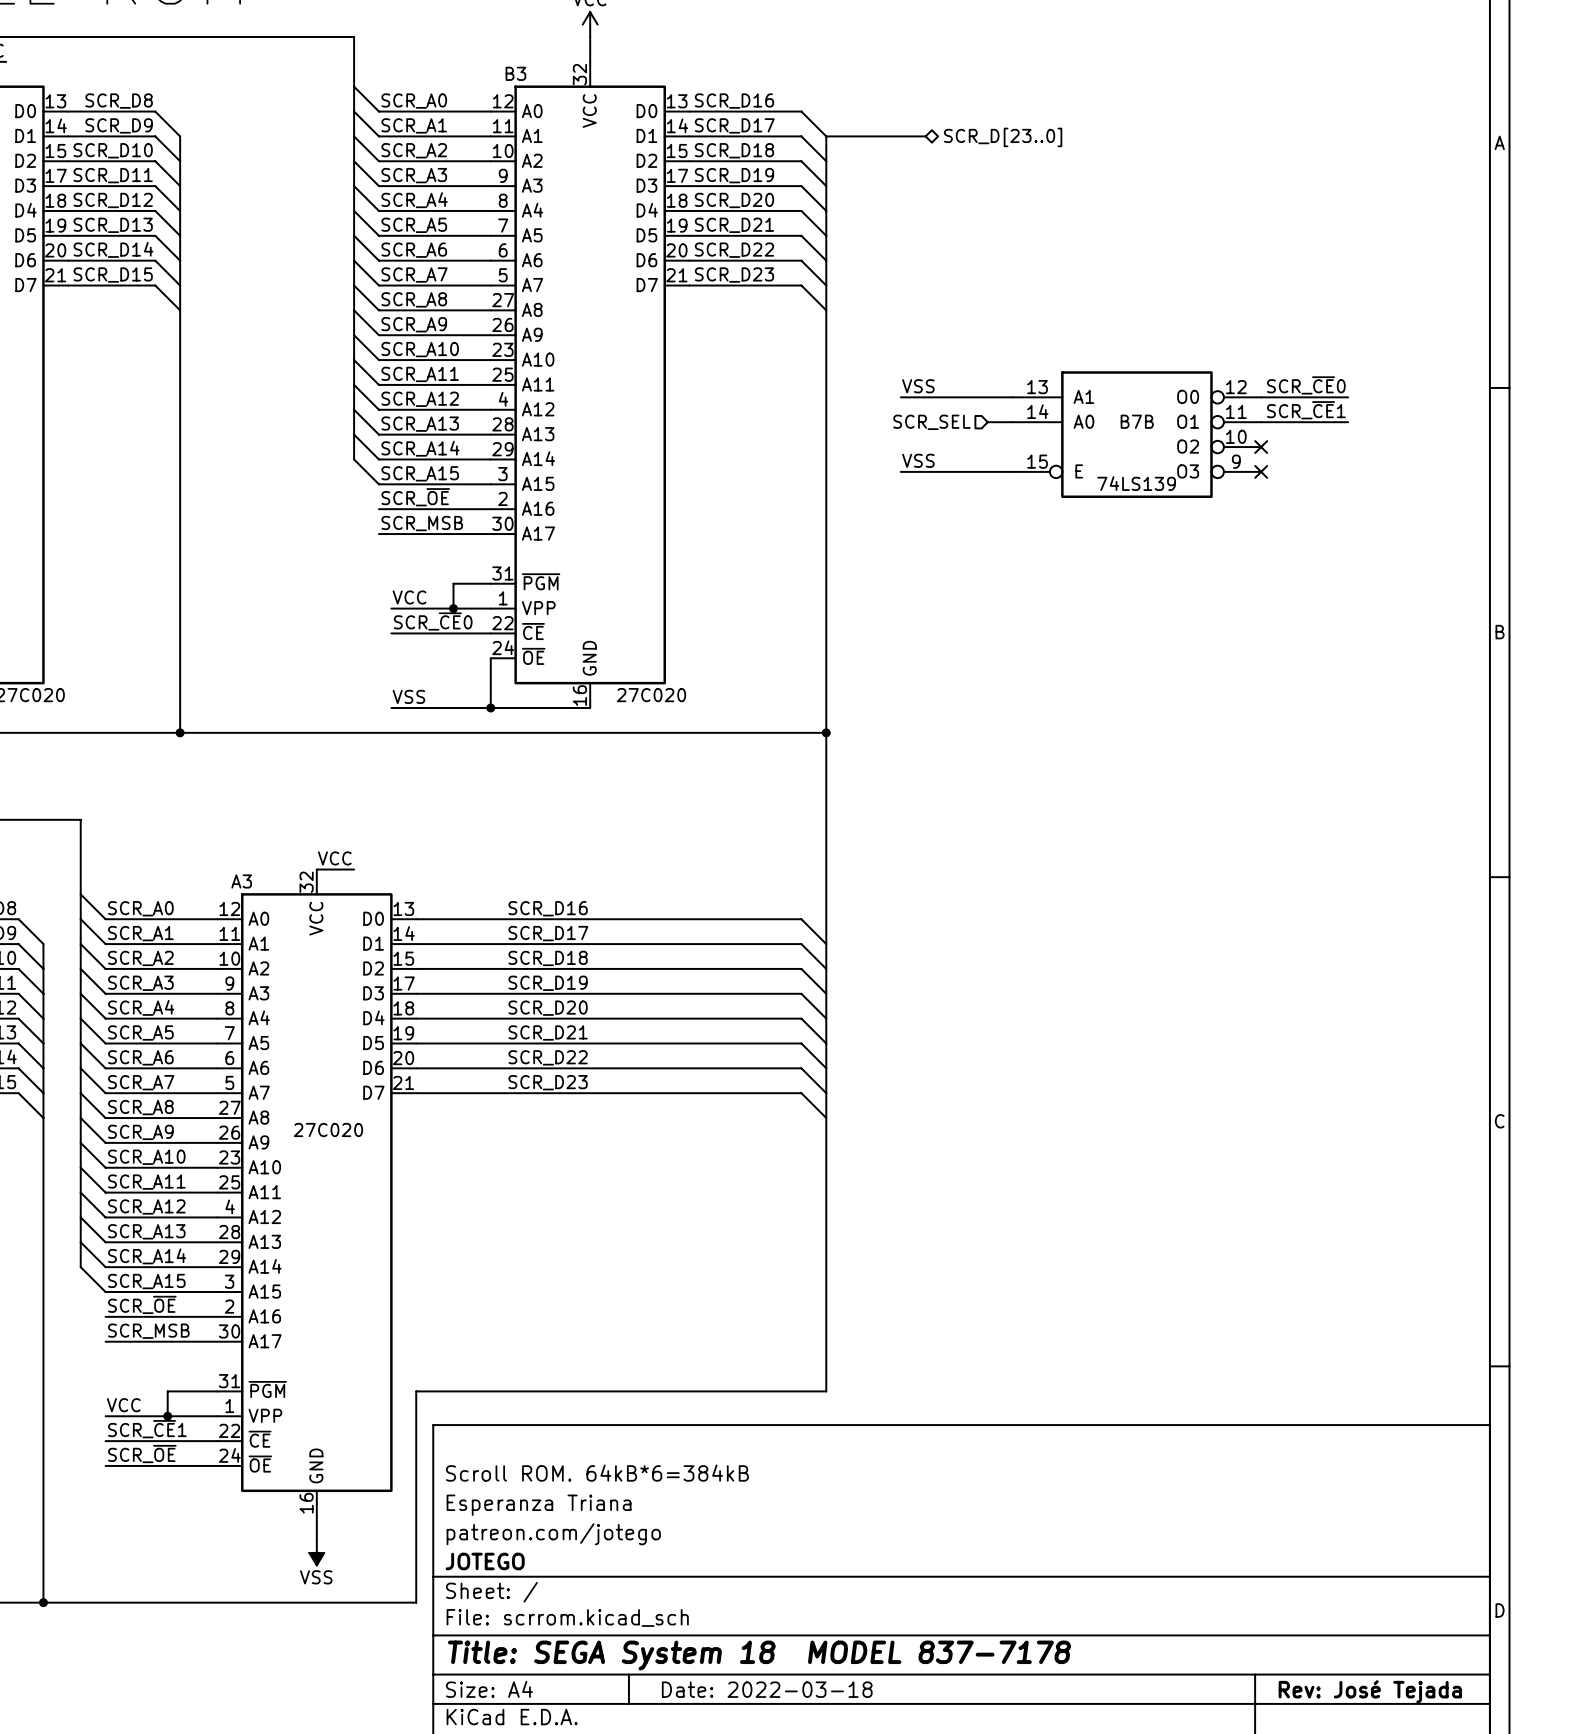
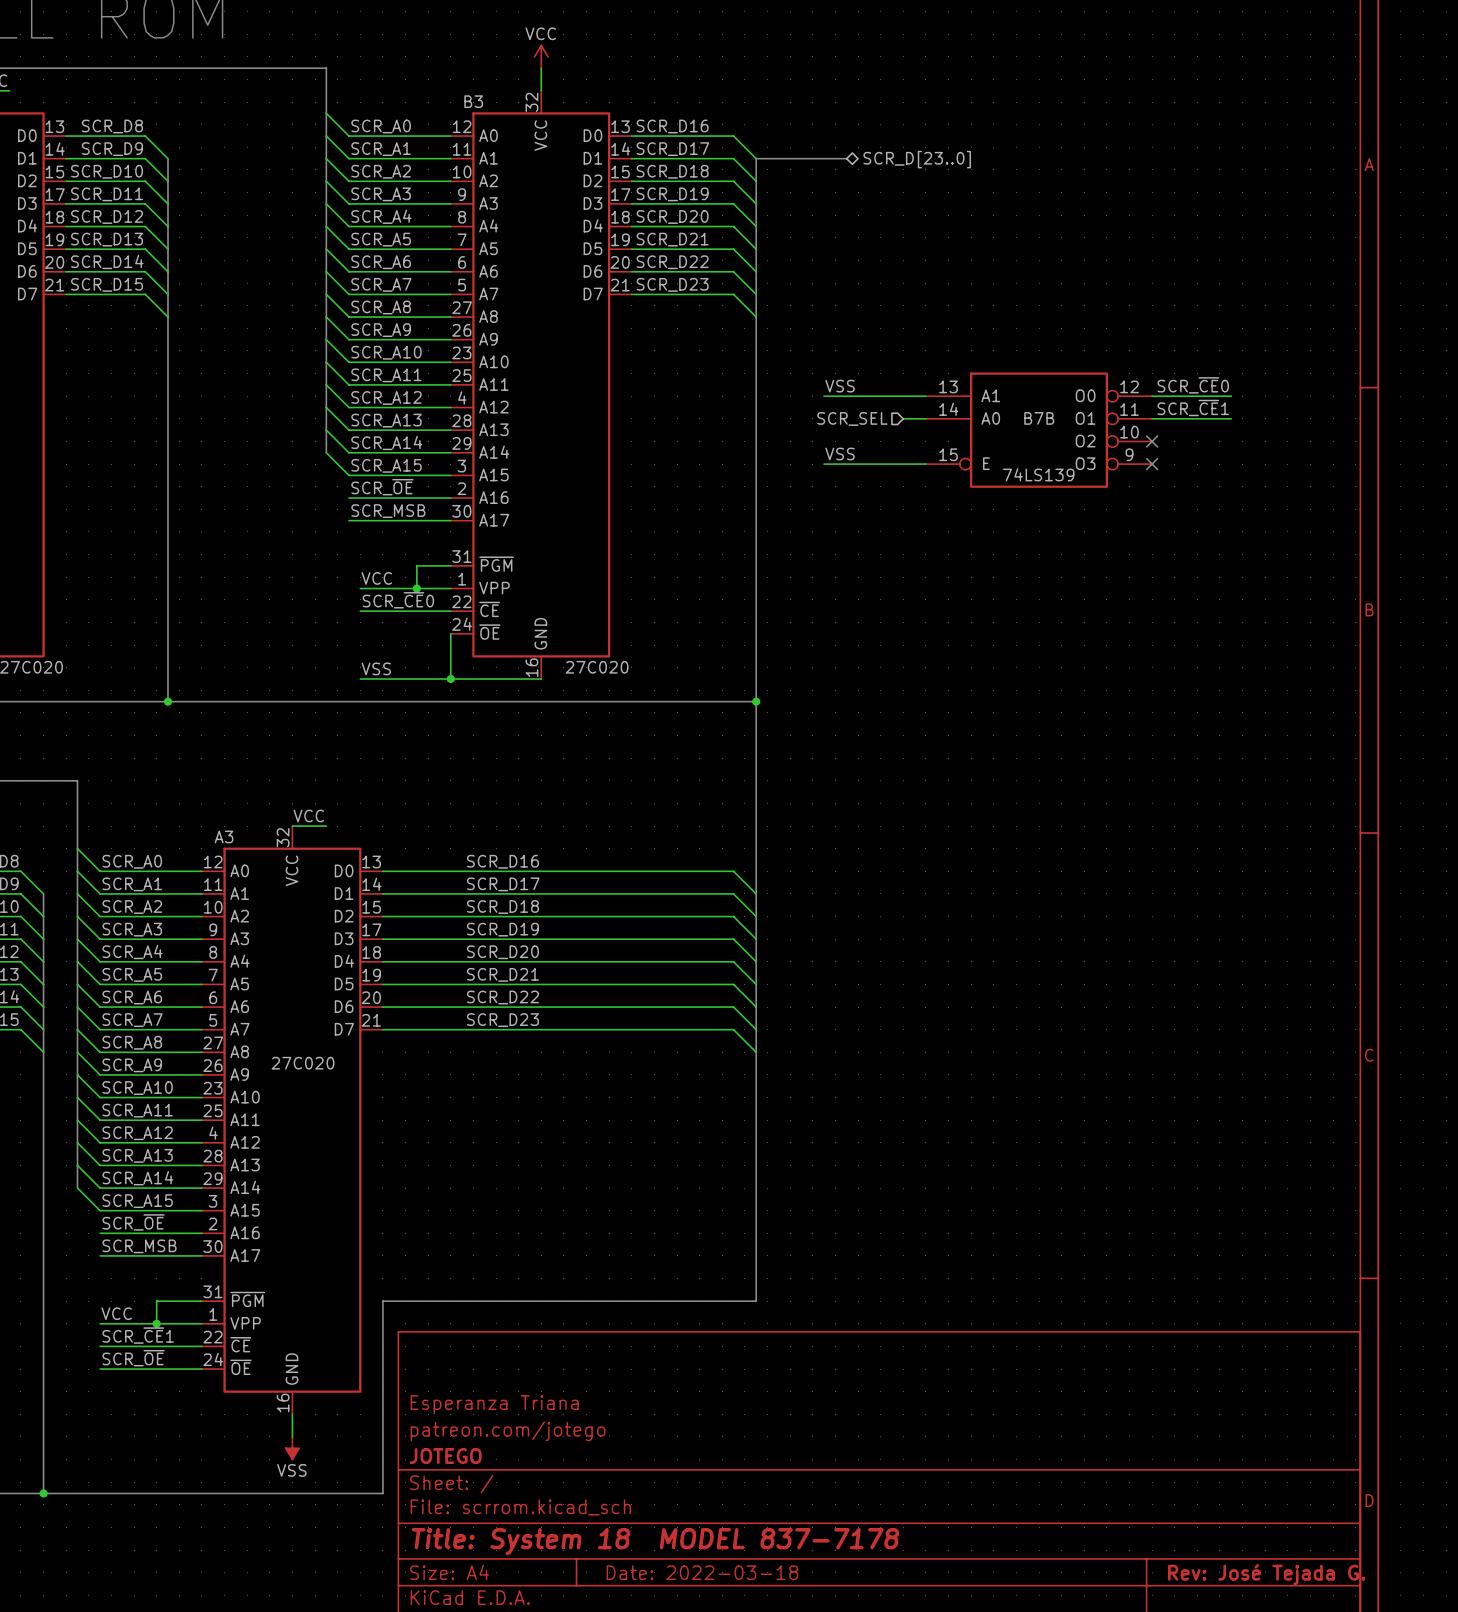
title block: Scroll ROM. 64kB*6=384kB (597, 1473) -> none
title block: Title: SEGA System 18 MODEL 837-7178 (759, 1655) -> Title: System 18 MODEL 837-7178 (655, 1541)
title block: Rev: José Tejada (1370, 1691) -> Rev: José Tejada G. (1266, 1574)

